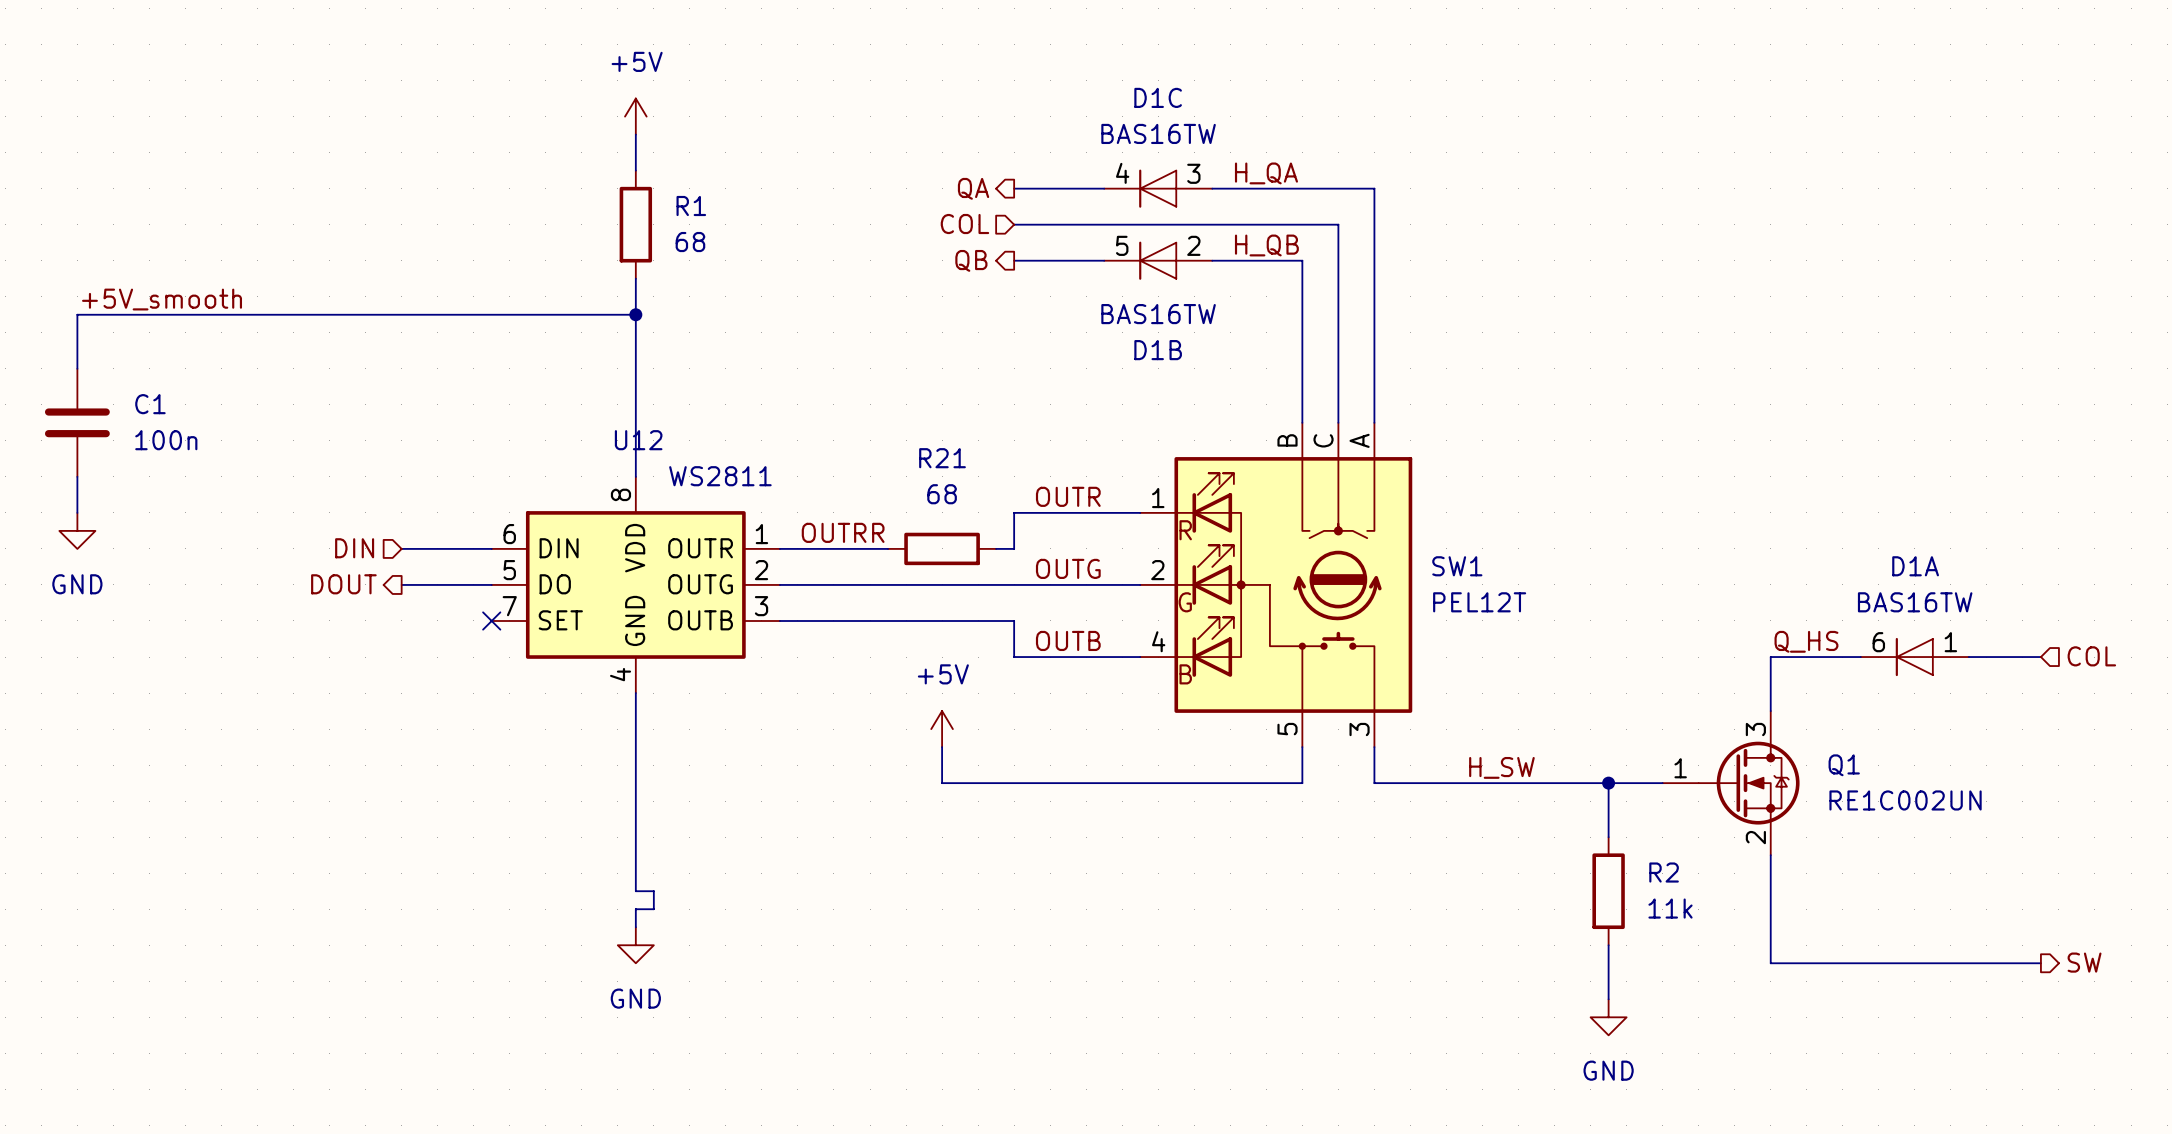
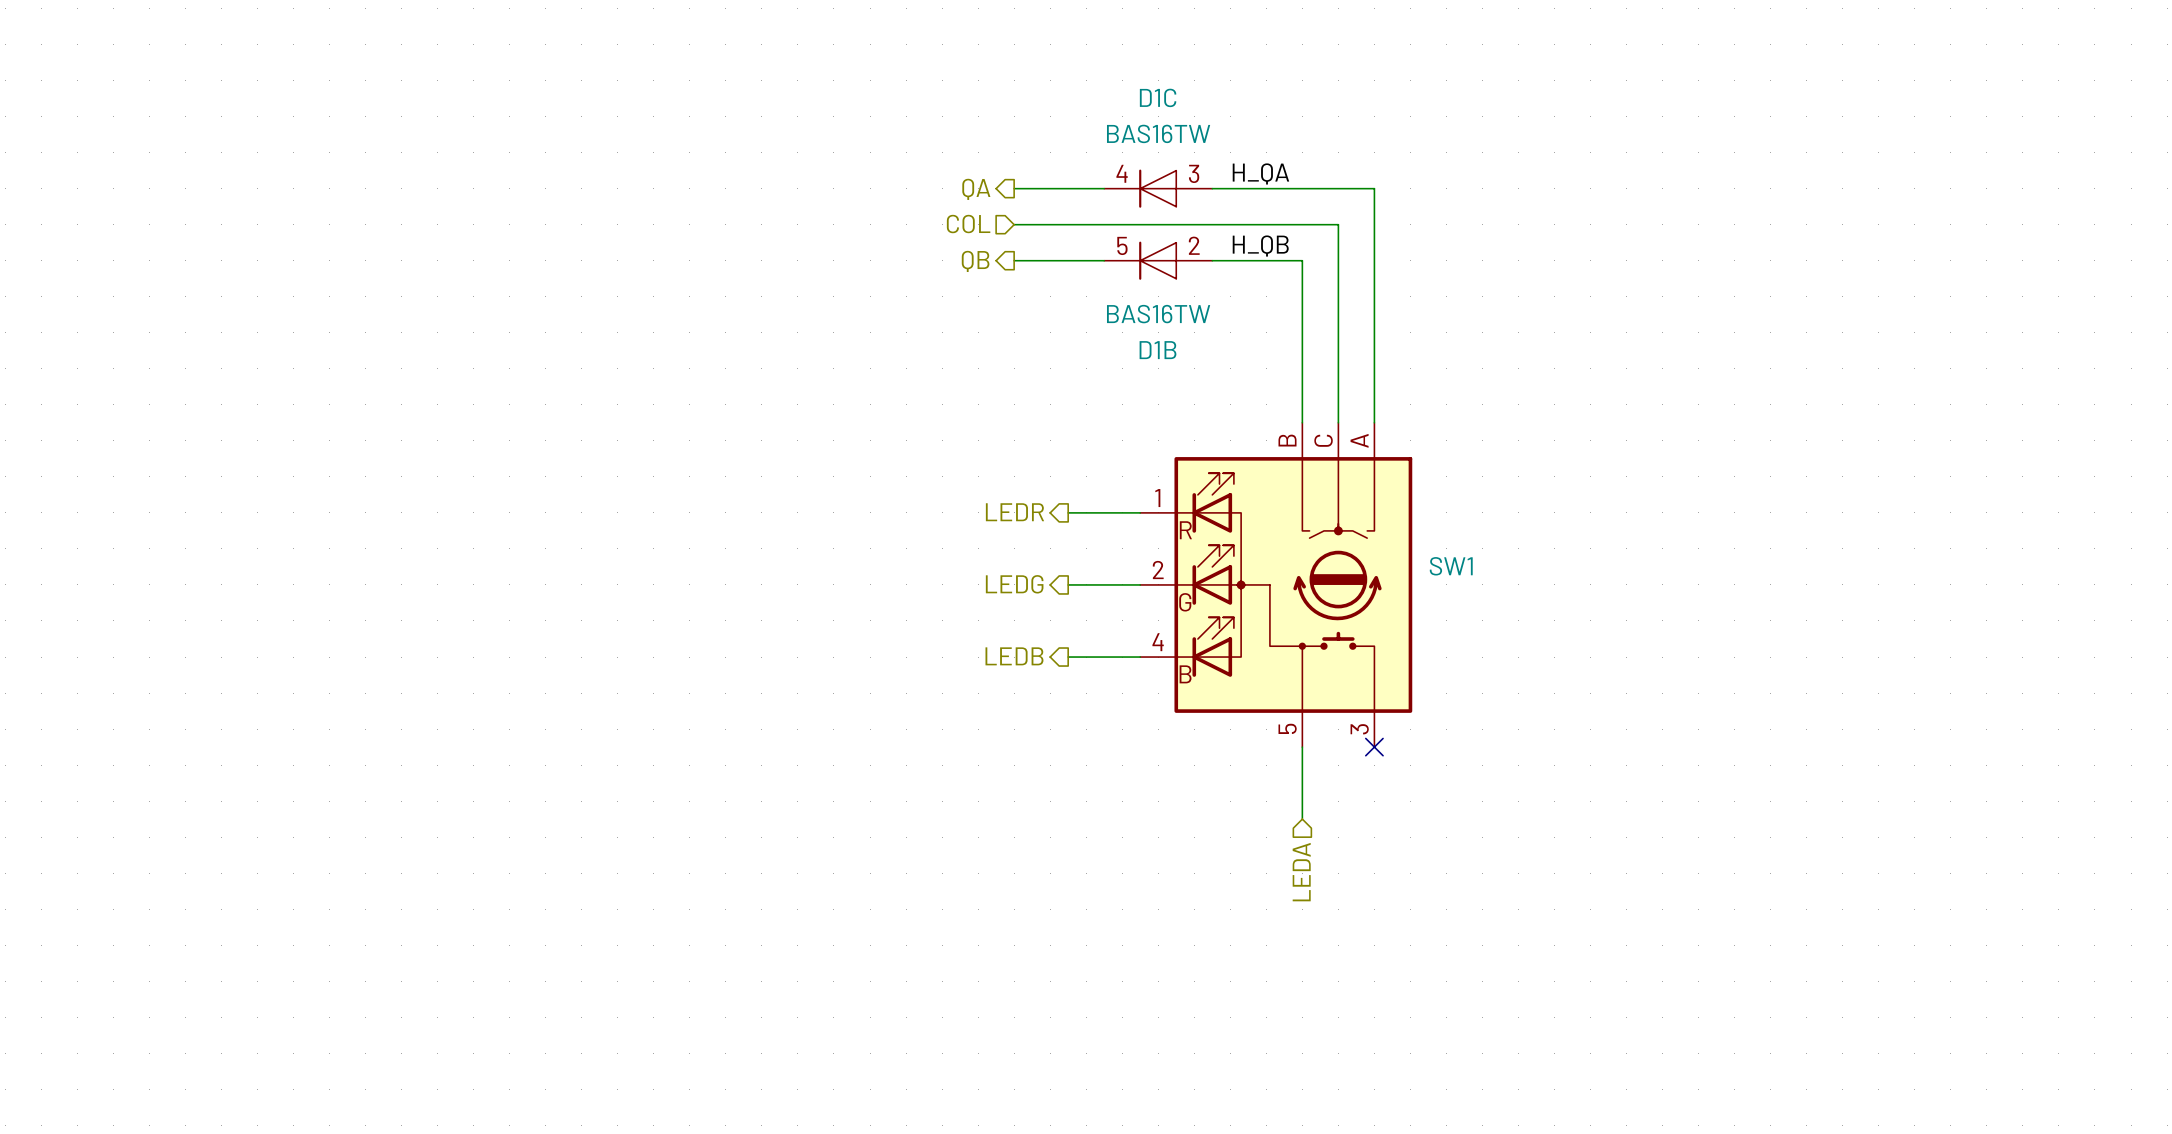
power symbol: +5V (635, 116) -> none
wire: (635, 134) (635, 170) -> none
R1: 68 (635, 224) -> none
wire: (635, 278) (635, 476) -> none
label: +5V_smooth (162, 299) -> none
wire: (635, 314) (77, 314) (77, 368) -> none
junction: (635, 314) -> none
C1: 100n (77, 422) -> none
wire: (77, 476) (77, 512) -> none
label: OUTR (1068, 496) -> none
hierarchical label: none -> LEDR (1014, 512)
wire: (1068, 512) (1014, 512) (1014, 548) (996, 548) -> none
power symbol: GND (77, 530) -> none
label: OUTRR (843, 532) -> none
hierarchical label: DIN (354, 548) -> none
wire: (401, 548) (491, 548) -> none
wire: (779, 548) (888, 548) -> none
R21: 68 (942, 548) -> none
label: OUTG (1068, 568) -> none
hierarchical label: DOUT (343, 584) -> none
wire: (401, 584) (491, 584) -> none
U12: WS2811 (635, 584) -> none
wire: (779, 584) (1068, 584) -> none
hierarchical label: none -> LEDG (1014, 584)
SW1 value: PEL12T (1479, 602) -> none
no-connect mark: (491, 620) -> none
wire: (779, 620) (1014, 620) (1014, 657) (1068, 657) -> none
label: OUTB (1068, 640) -> none
label: Q_HS (1806, 641) -> none
hierarchical label: none -> LEDB (1014, 656)
hierarchical label: COL (2091, 656) -> none
wire: (1860, 657) (1770, 657) (1770, 711) -> none
D1A: BAS16TW (1914, 657) -> none
wire: (1968, 657) (2040, 657) -> none
wire: (635, 693) (635, 891) (653, 891) (653, 909) (635, 909) (635, 927) -> none
power symbol: +5V (942, 729) -> none
wire: (942, 747) (942, 783) (1302, 783) -> (1302, 819) (1302, 783)
wire: (1374, 747) (1374, 783) (1662, 783) -> none
no-connect mark: none -> (1374, 747)
label: H_SW (1501, 767) -> none
wire: (1608, 783) (1608, 837) -> none
junction: (1608, 783) -> none
Q1: RE1C002UN (1731, 783) -> none
wire: (1770, 855) (1770, 963) (2040, 963) -> none
hierarchical label: none -> LEDA (1301, 872)
R2: 11k (1608, 891) -> none
power symbol: GND (635, 945) -> none
wire: (1608, 945) (1608, 999) -> none
hierarchical label: SW (2084, 962) -> none
power symbol: GND (1608, 1017) -> none

